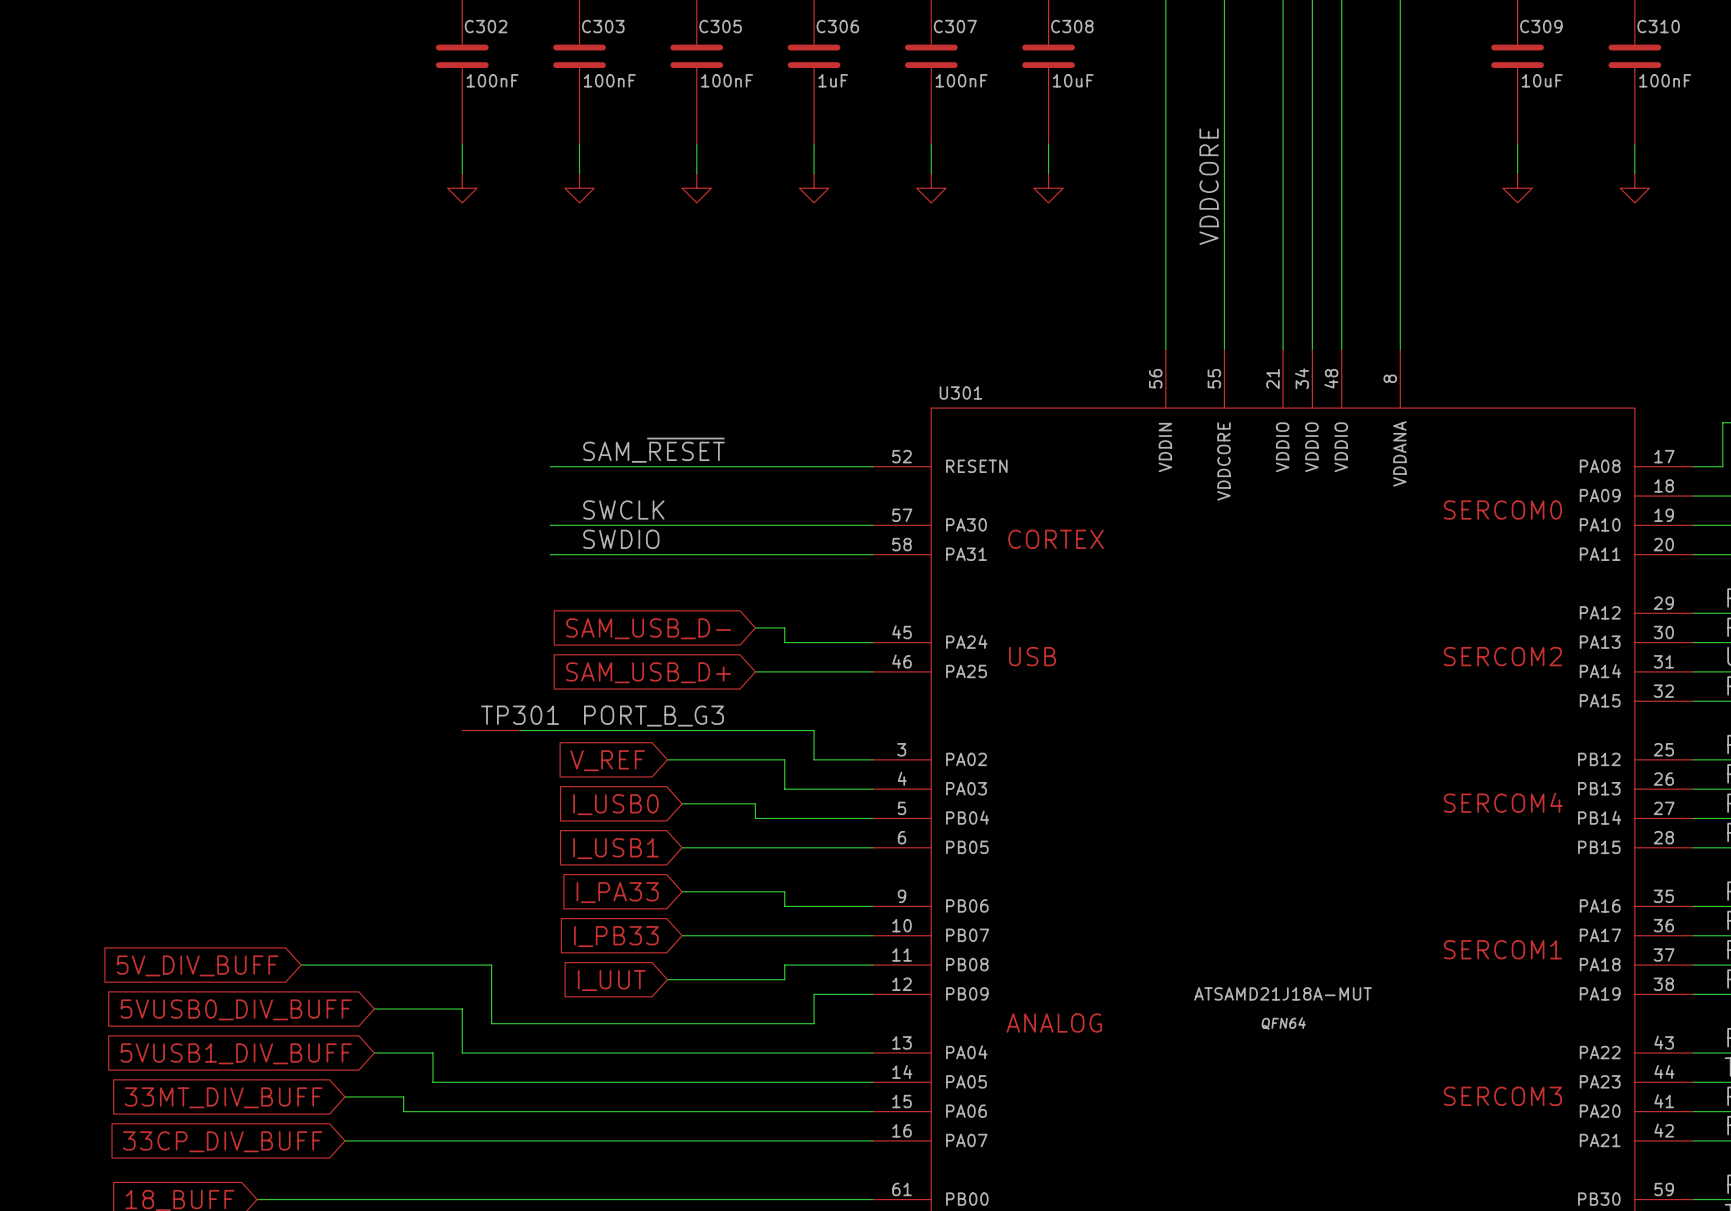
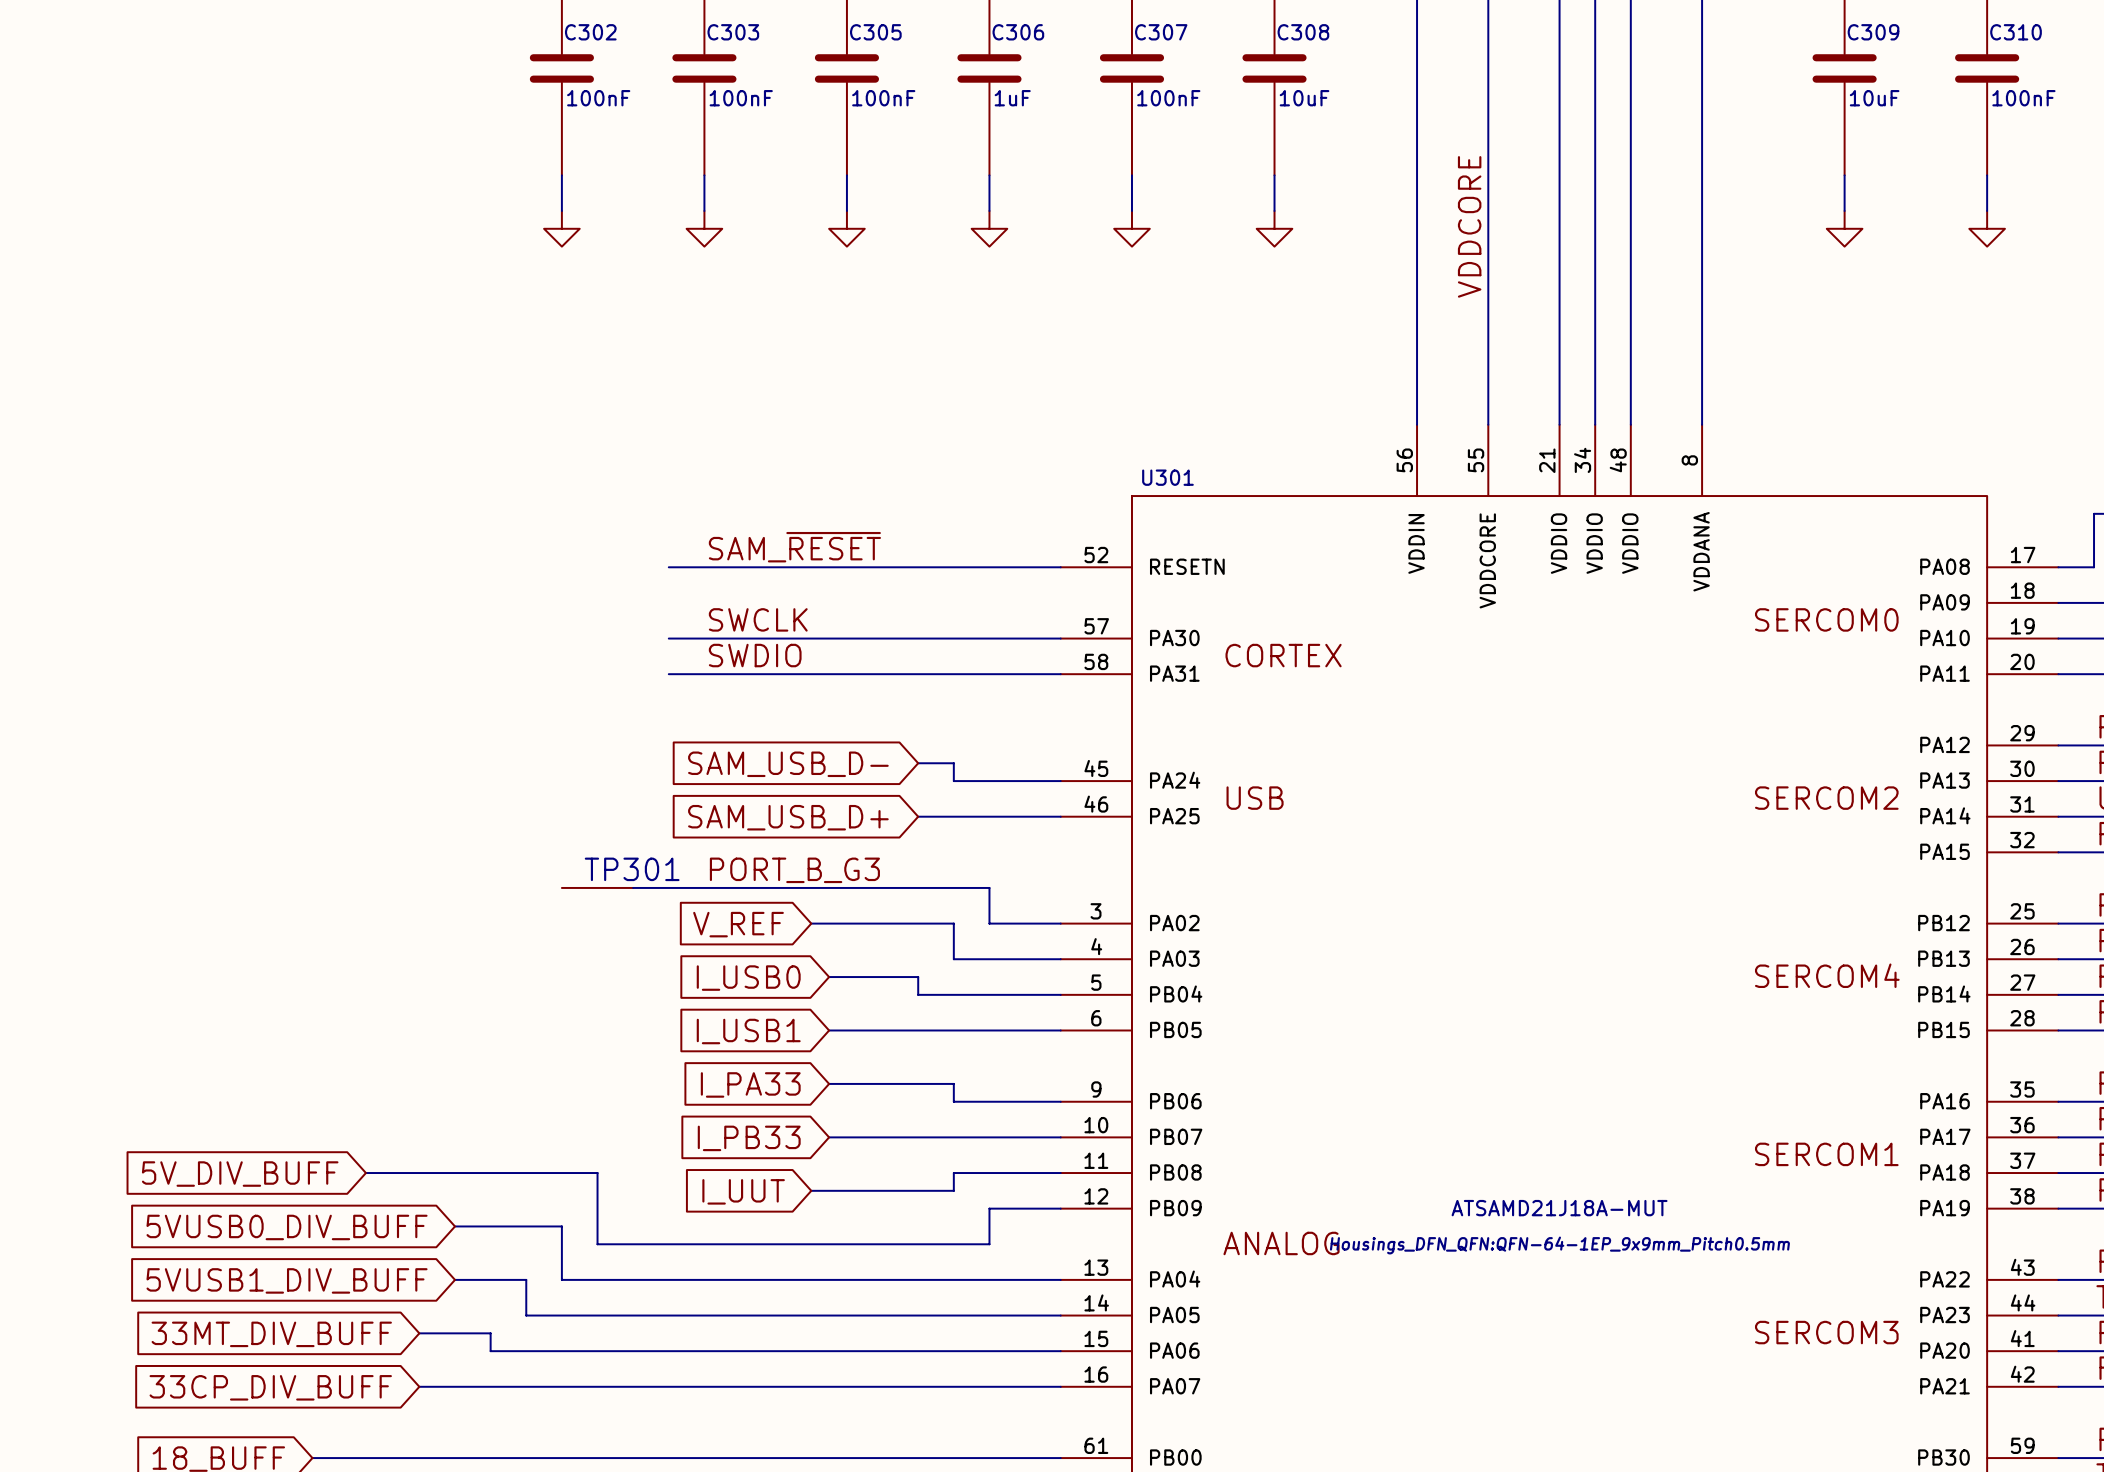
U301 text: QFN64 (1283, 1023) -> Housings_DFN_QFN:QFN-64-1EP_9x9mm_Pitch0.5mm (1559, 1245)

